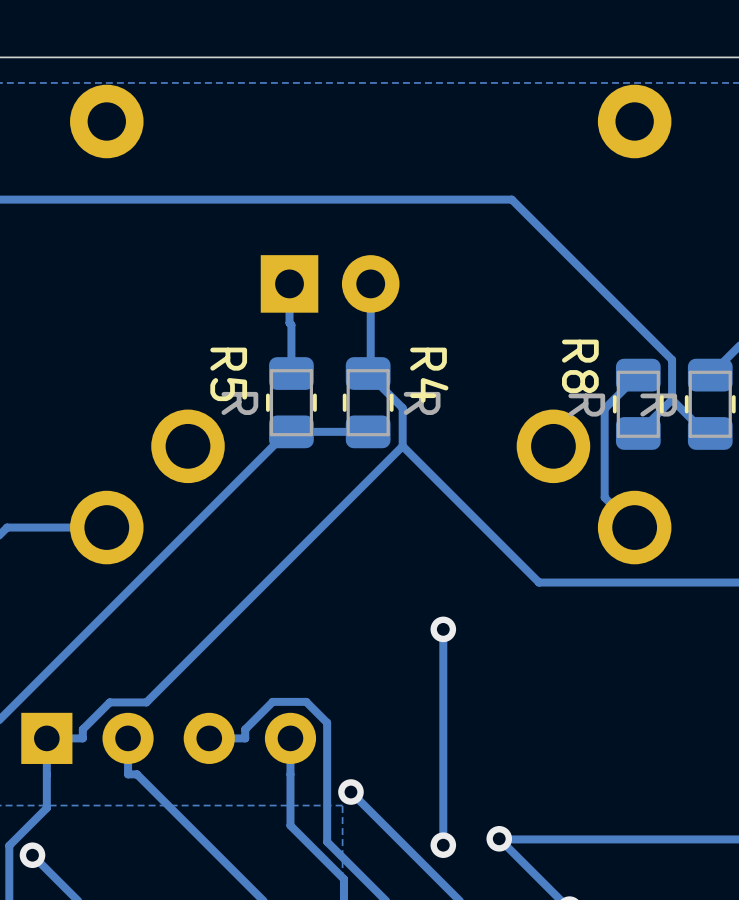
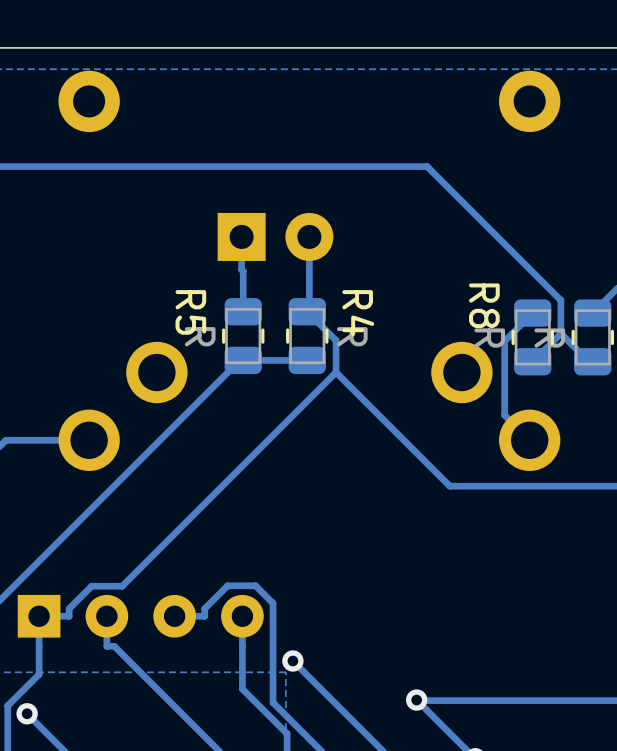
track: (443, 629) (443, 845) -> none
via: (443, 629) -> none
via: (443, 845) -> none

